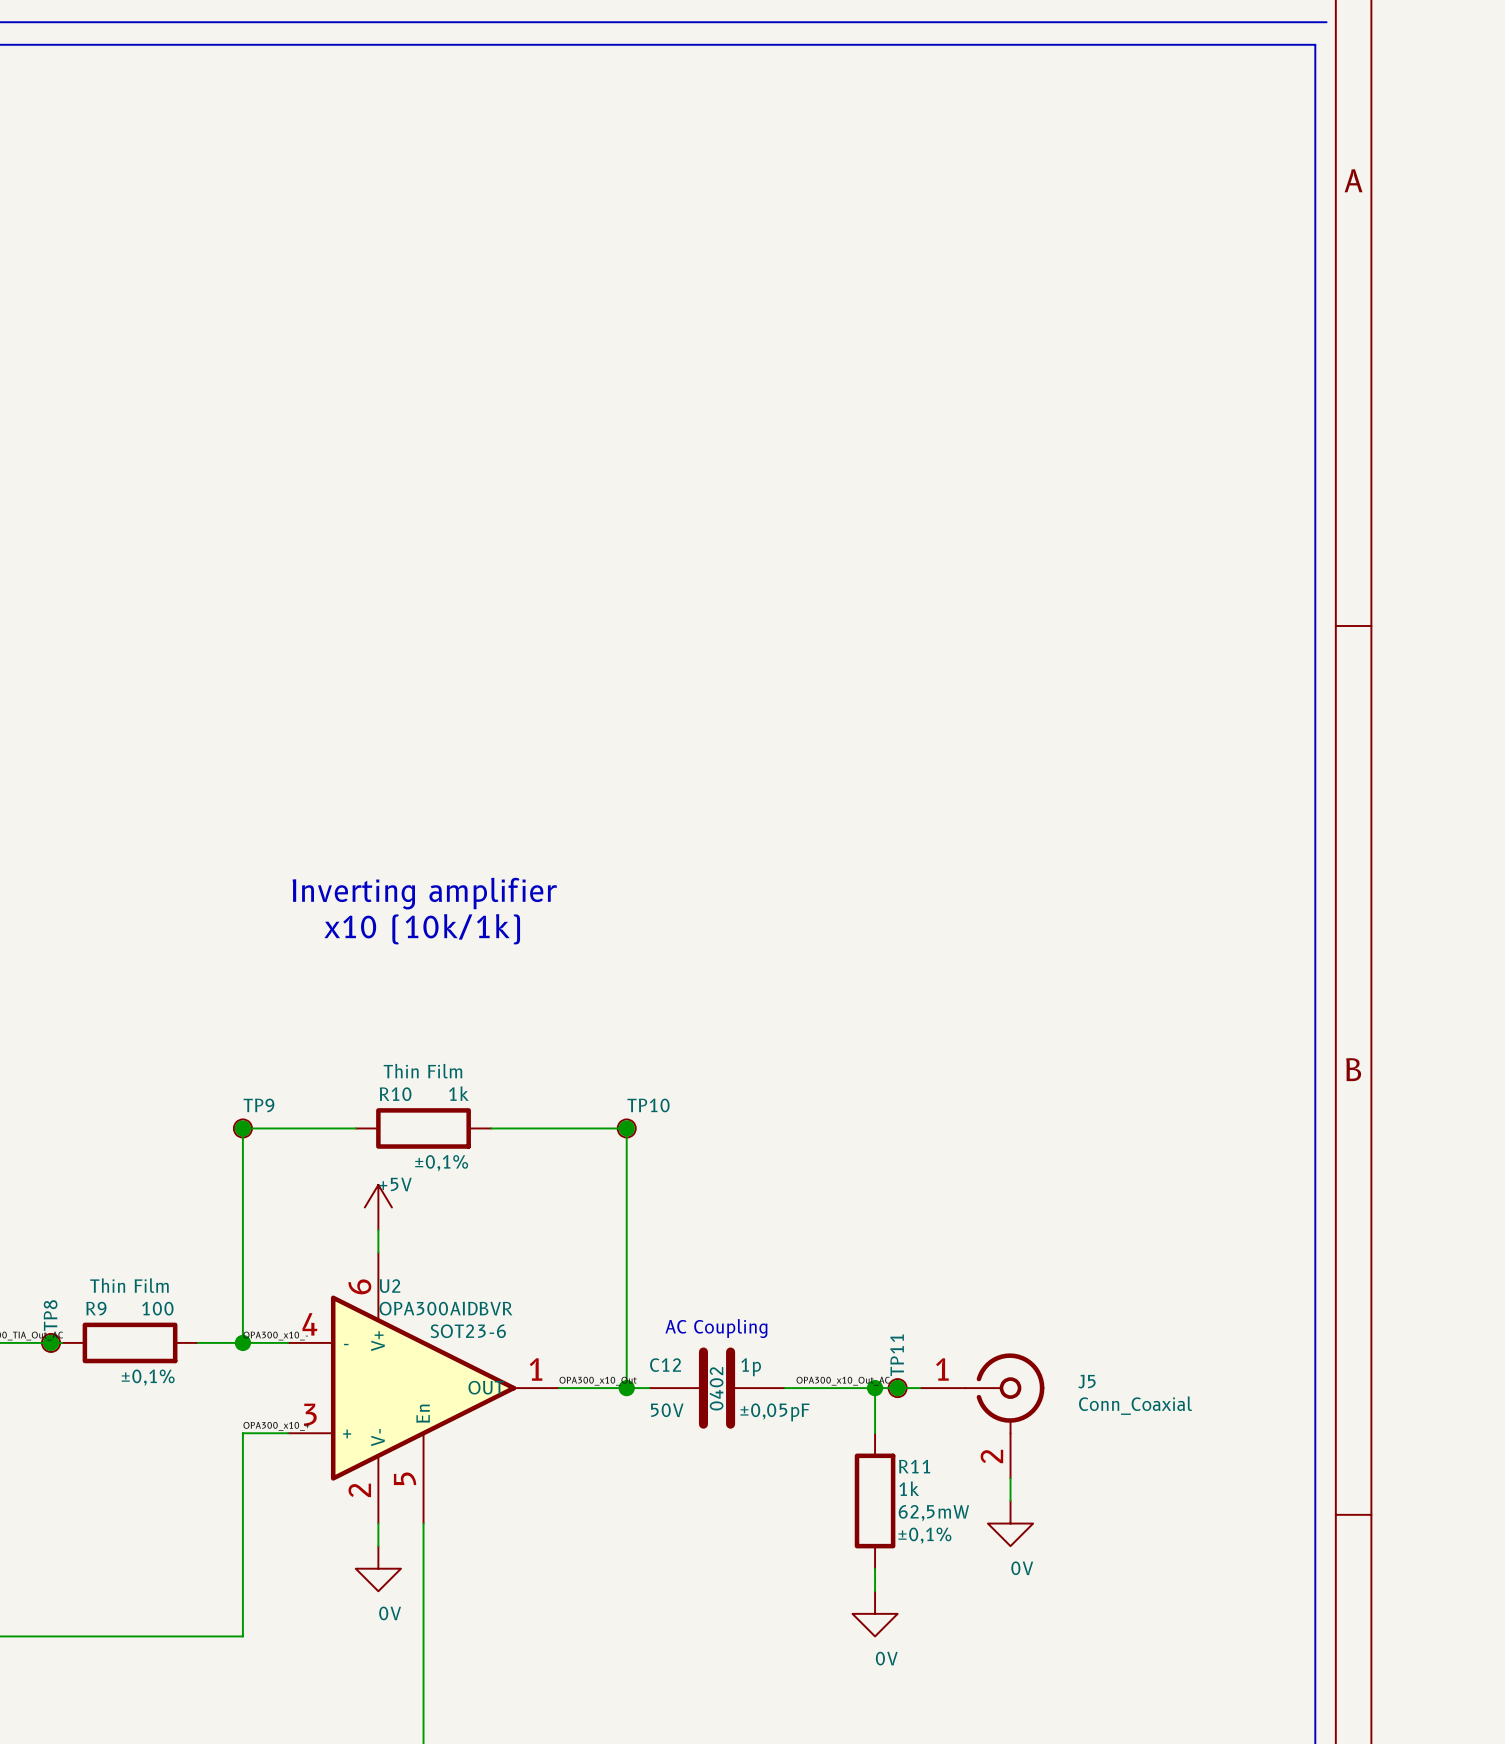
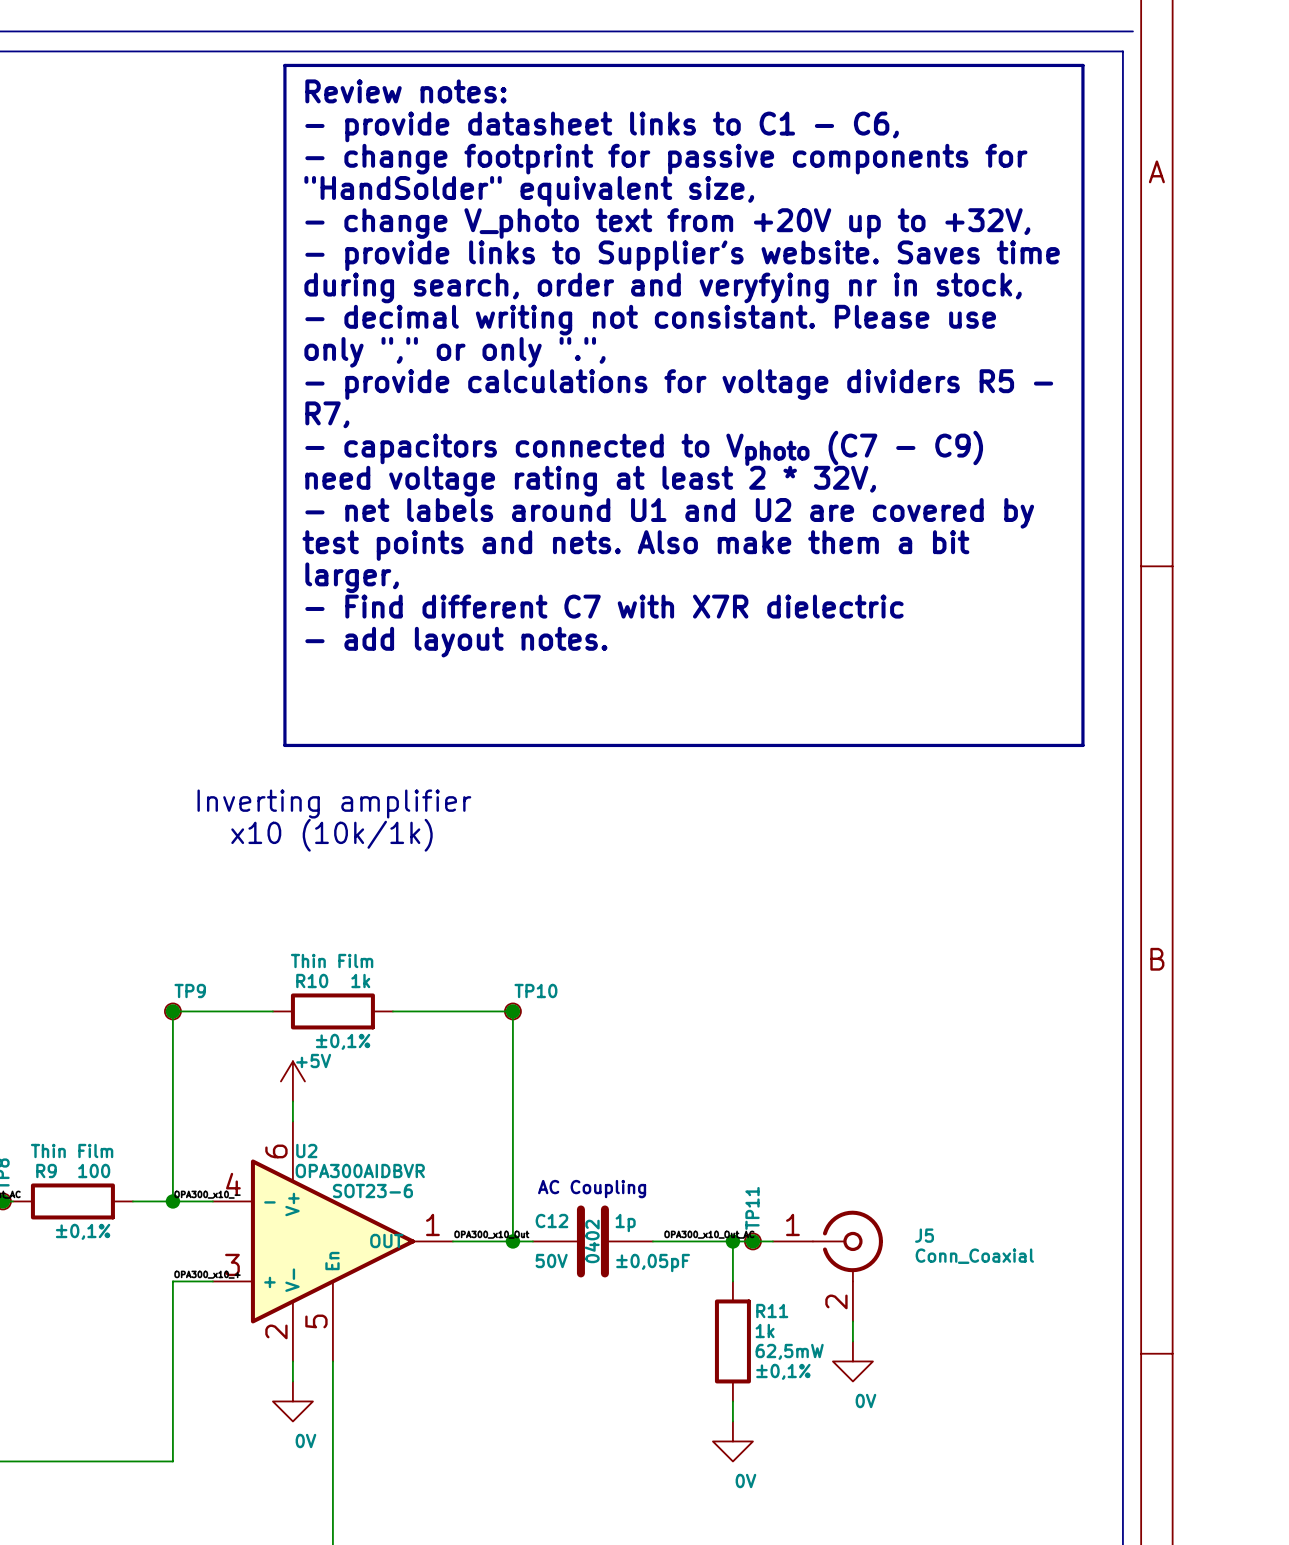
line: none -> (284, 65) (1082, 65) (1082, 745) (284, 745) (284, 65)
text: none -> Review notes: (405, 91)
text: none -> - provide datasheet links to C1 - C6, (602, 126)
text: none -> - change footprint for passive components for (666, 159)
text: none -> "HandSolder" equivalent size, (529, 191)
text: none -> - change V_photo text from +20V up to +32V, (667, 223)
text: none -> - provide links to Supplier's website. Saves time (682, 255)
text: none -> during search, order and veryfying nr in stock, (663, 287)
text: none -> - decimal writing not consistant. Please use (650, 320)
text: none -> only "," or only ".", (454, 352)
text: none -> - provide calculations for voltage dividers R5 - (679, 384)
text: none -> R7, (327, 414)
text: none -> - capacitors connected to Vphoto (C7 - C9) (644, 448)
text: none -> need voltage rating at least 2 * 32V, (590, 481)
text: none -> - net labels around U1 and U2 are covered by (669, 513)
text: none -> test points and nets. Also make them a bit (635, 545)
text: none -> larger, (352, 577)
text: none -> - Find different C7 with X7R dielectric (604, 606)
text: none -> - add layout notes. (456, 642)

